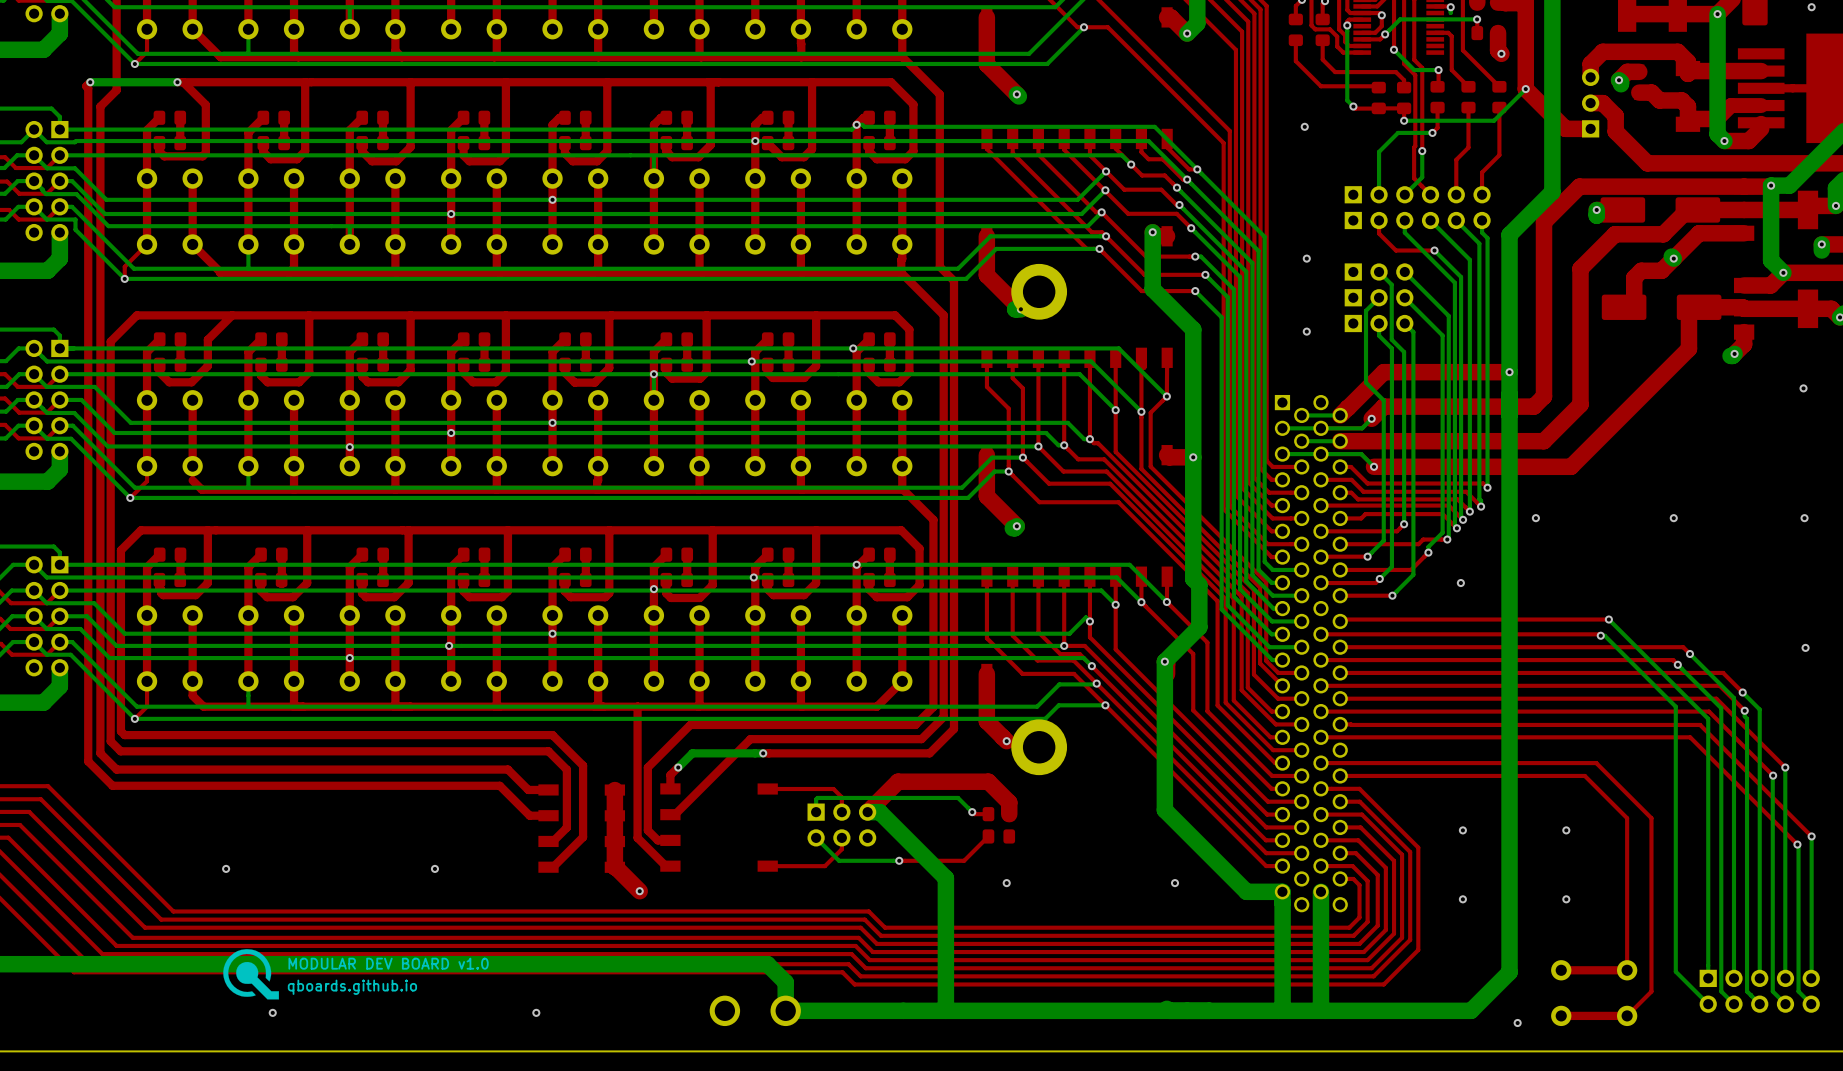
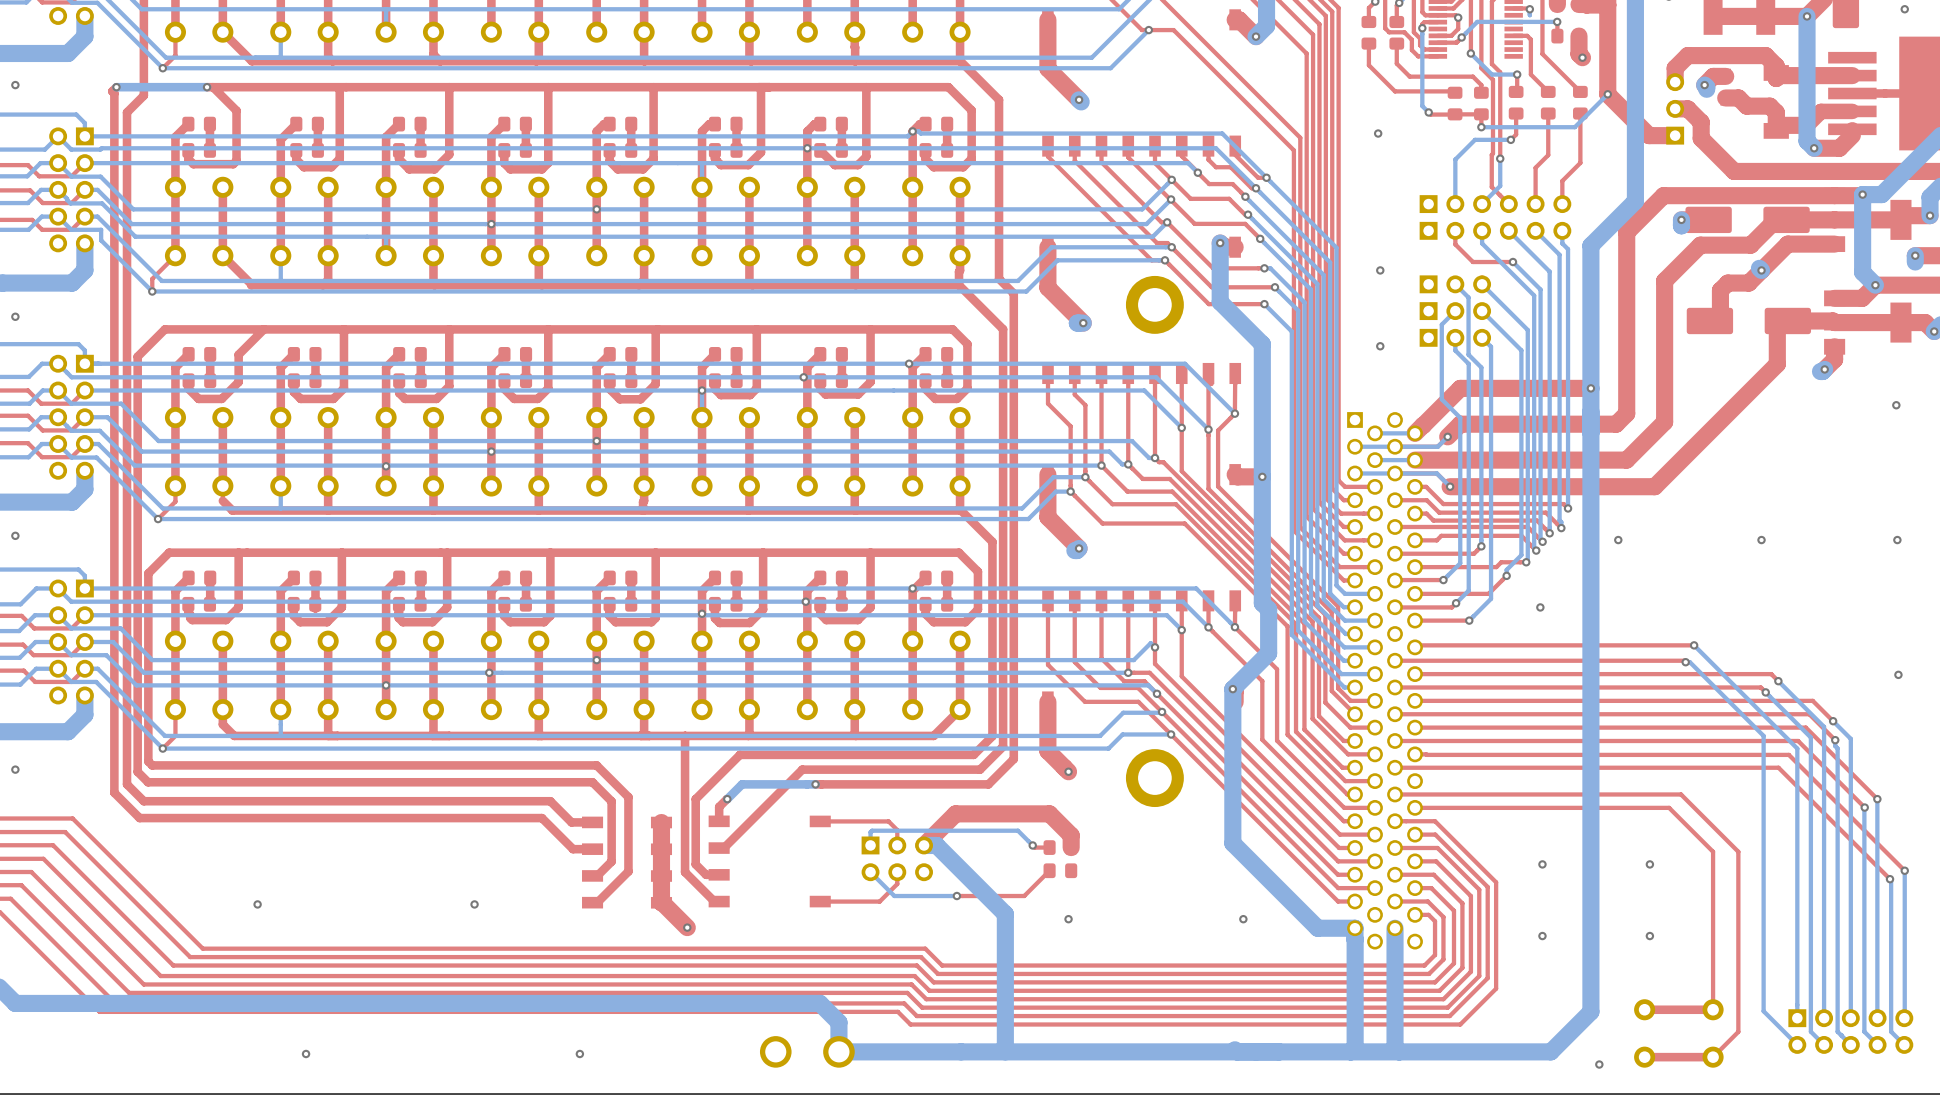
part position: (1039, 291) -> (1154, 304)
part position: (1039, 747) -> (1154, 778)
MODULAR DEV BOARD v1.0: (251, 974) -> none

